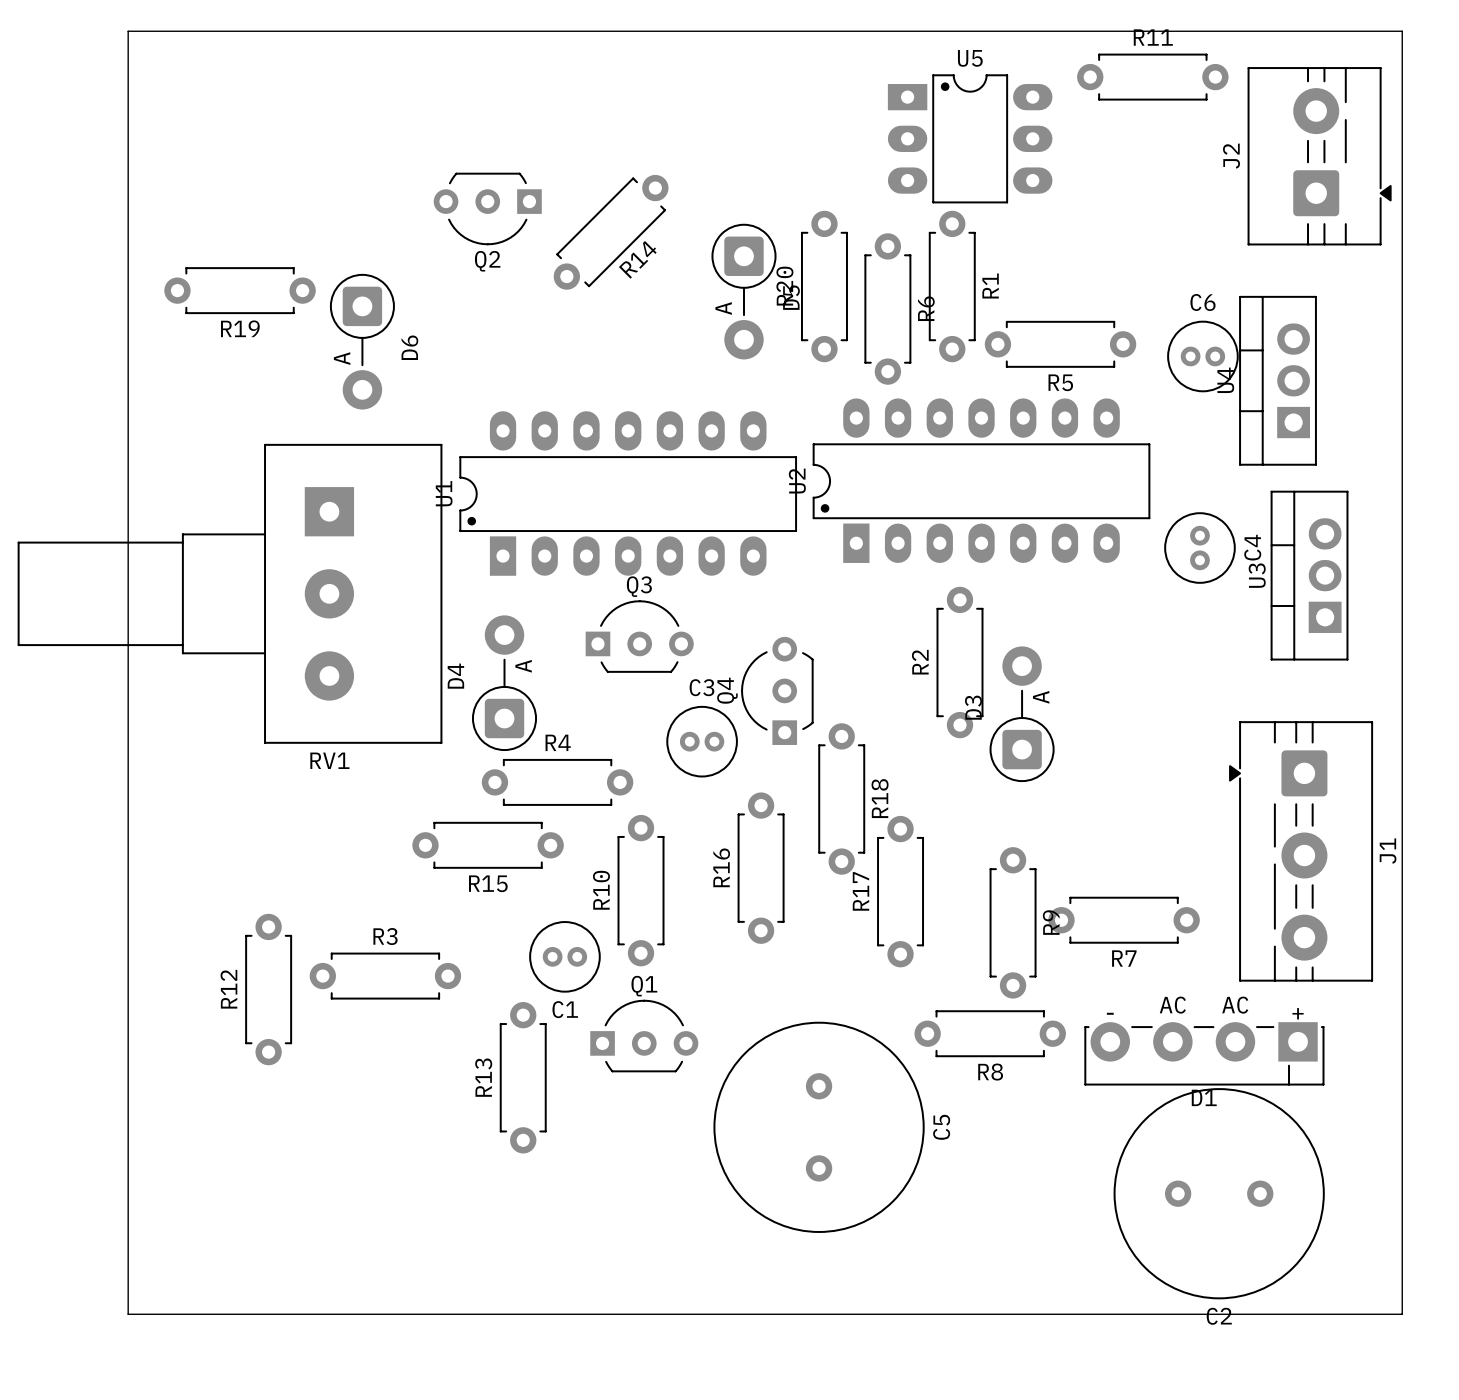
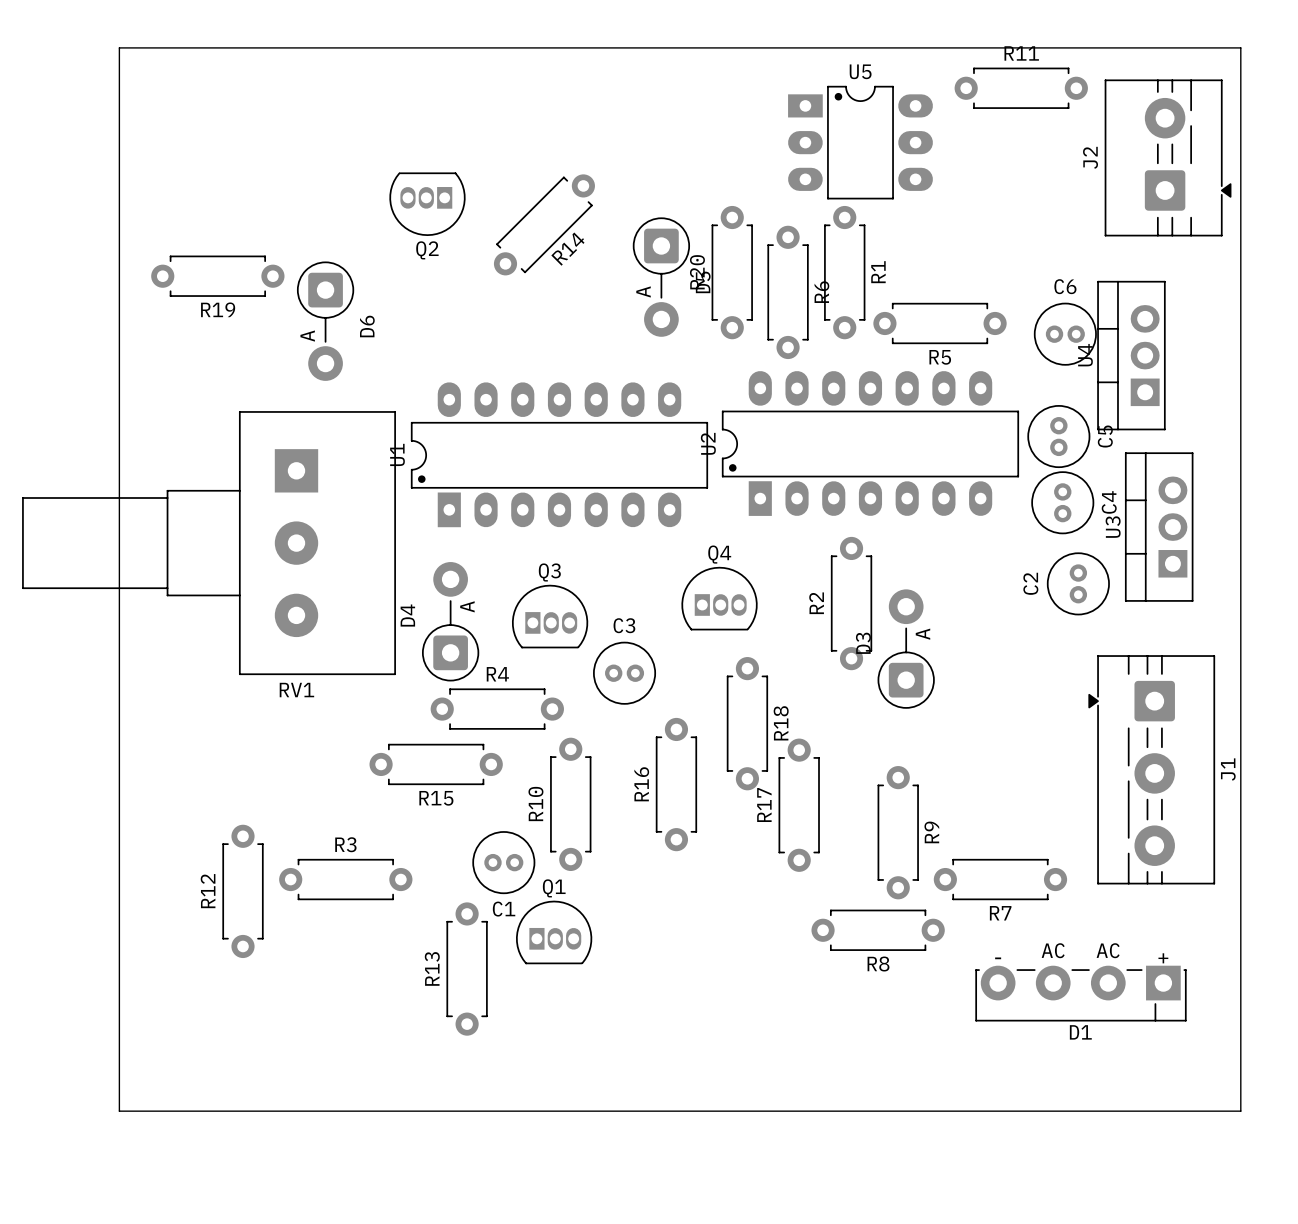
Q2 footprint: [433, 172, 542, 246] -> [389, 172, 466, 237]
Q3 footprint: [585, 600, 694, 673] -> [511, 584, 589, 649]
Q4 footprint: [741, 636, 814, 745] -> [681, 566, 758, 631]
Q4 name position: Q4 (727, 690) -> Q4 (719, 554)
R7 position: (1124, 920) -> (1000, 879)
Q1 footprint: [590, 999, 699, 1073] -> [516, 900, 593, 965]
C5 footprint: [713, 1021, 925, 1233] -> [1027, 405, 1091, 469]
D1 position: (1204, 1053) -> (1080, 993)
C2 footprint: [1113, 1088, 1325, 1300] -> [1046, 552, 1110, 616]
C5 name position: C5 (941, 1127) -> C5 (1105, 436)
board edge: (128, 1239) (128, 1314) (1402, 1314) (1402, 1239) -> (119, 1111) (1240, 1111)
C2 name position: C2 (1219, 1316) -> C2 (1030, 583)

